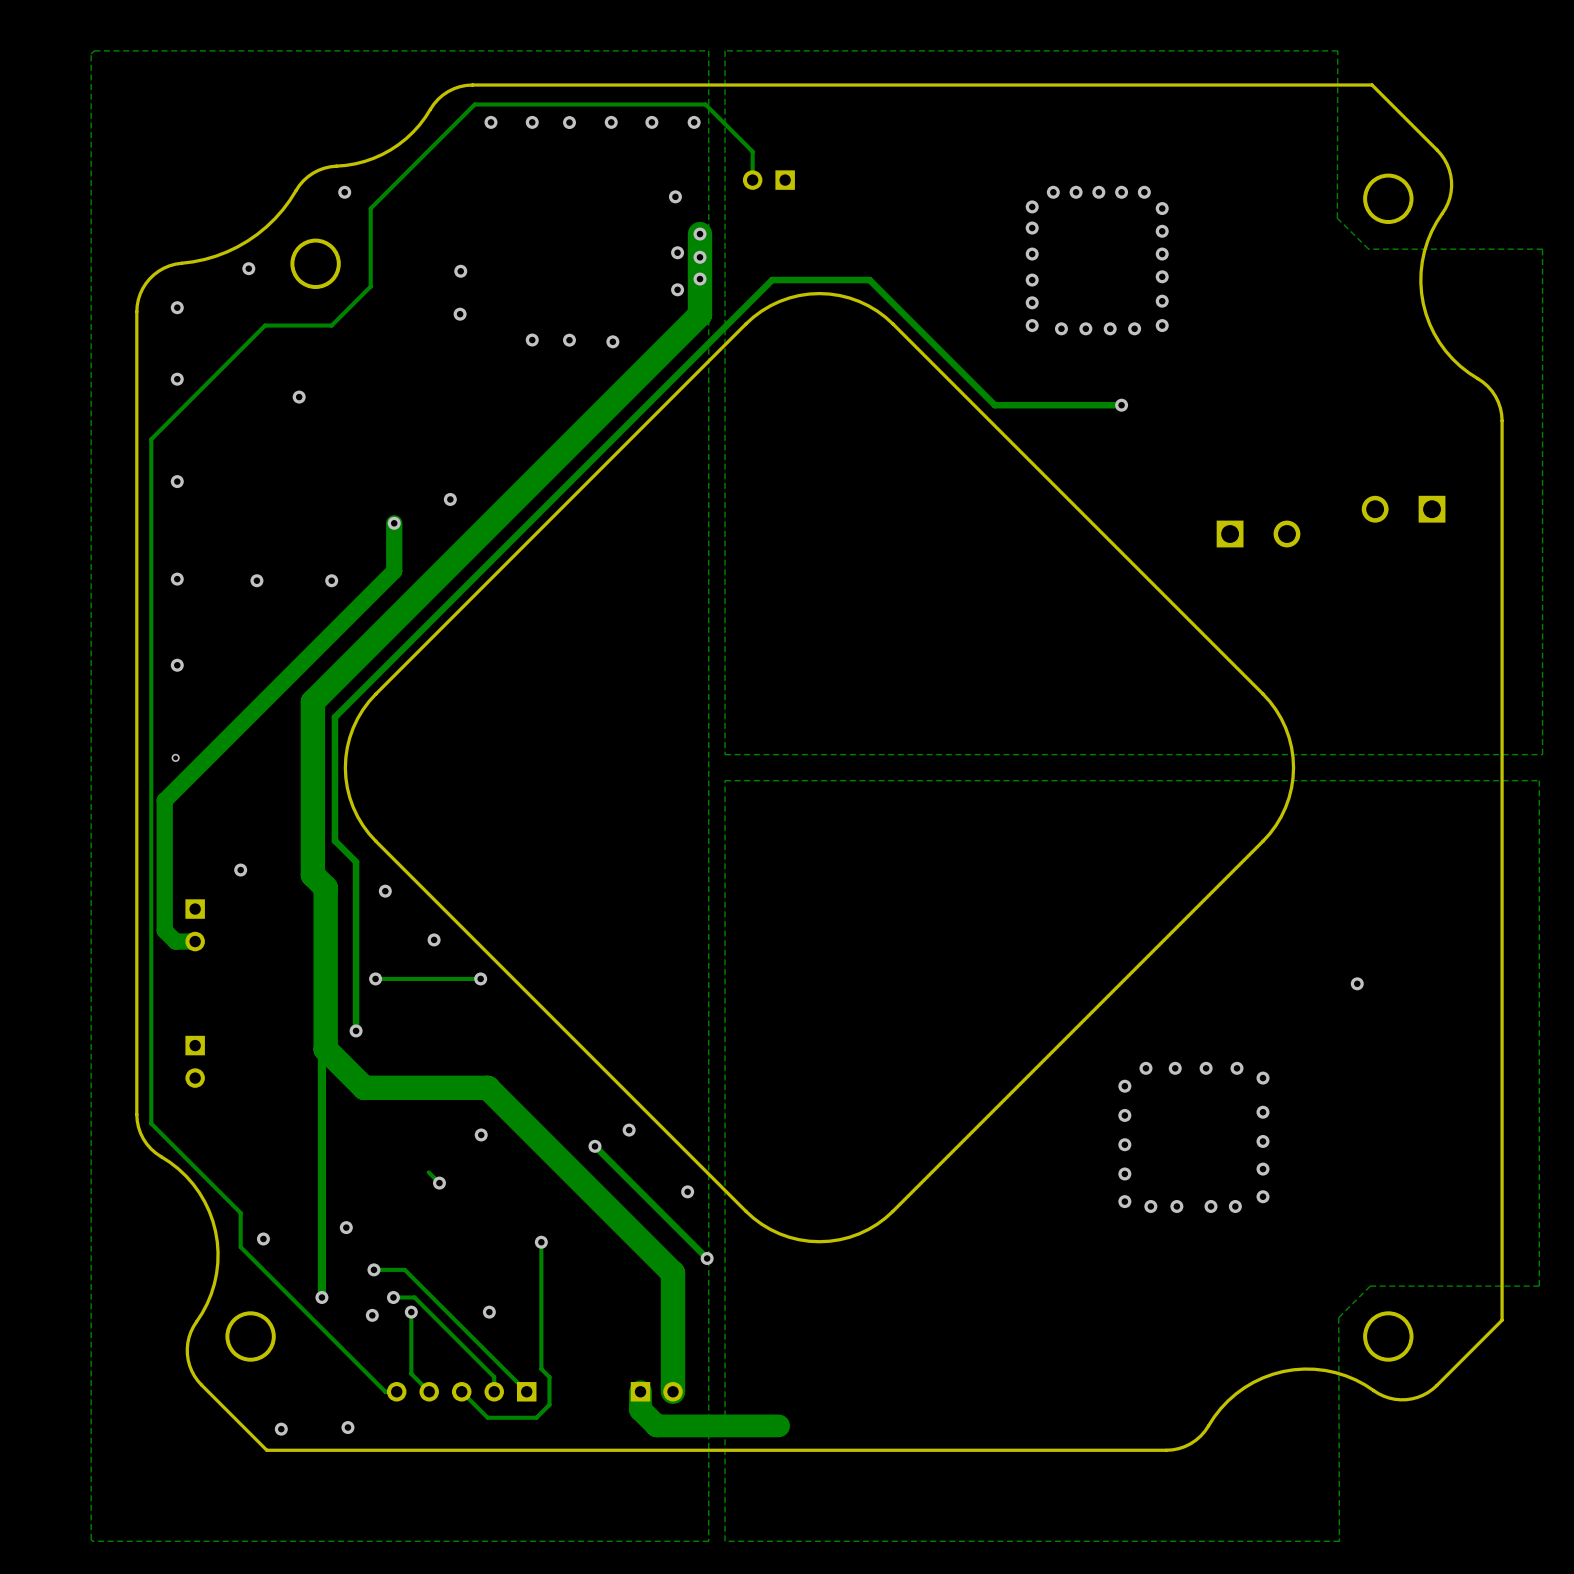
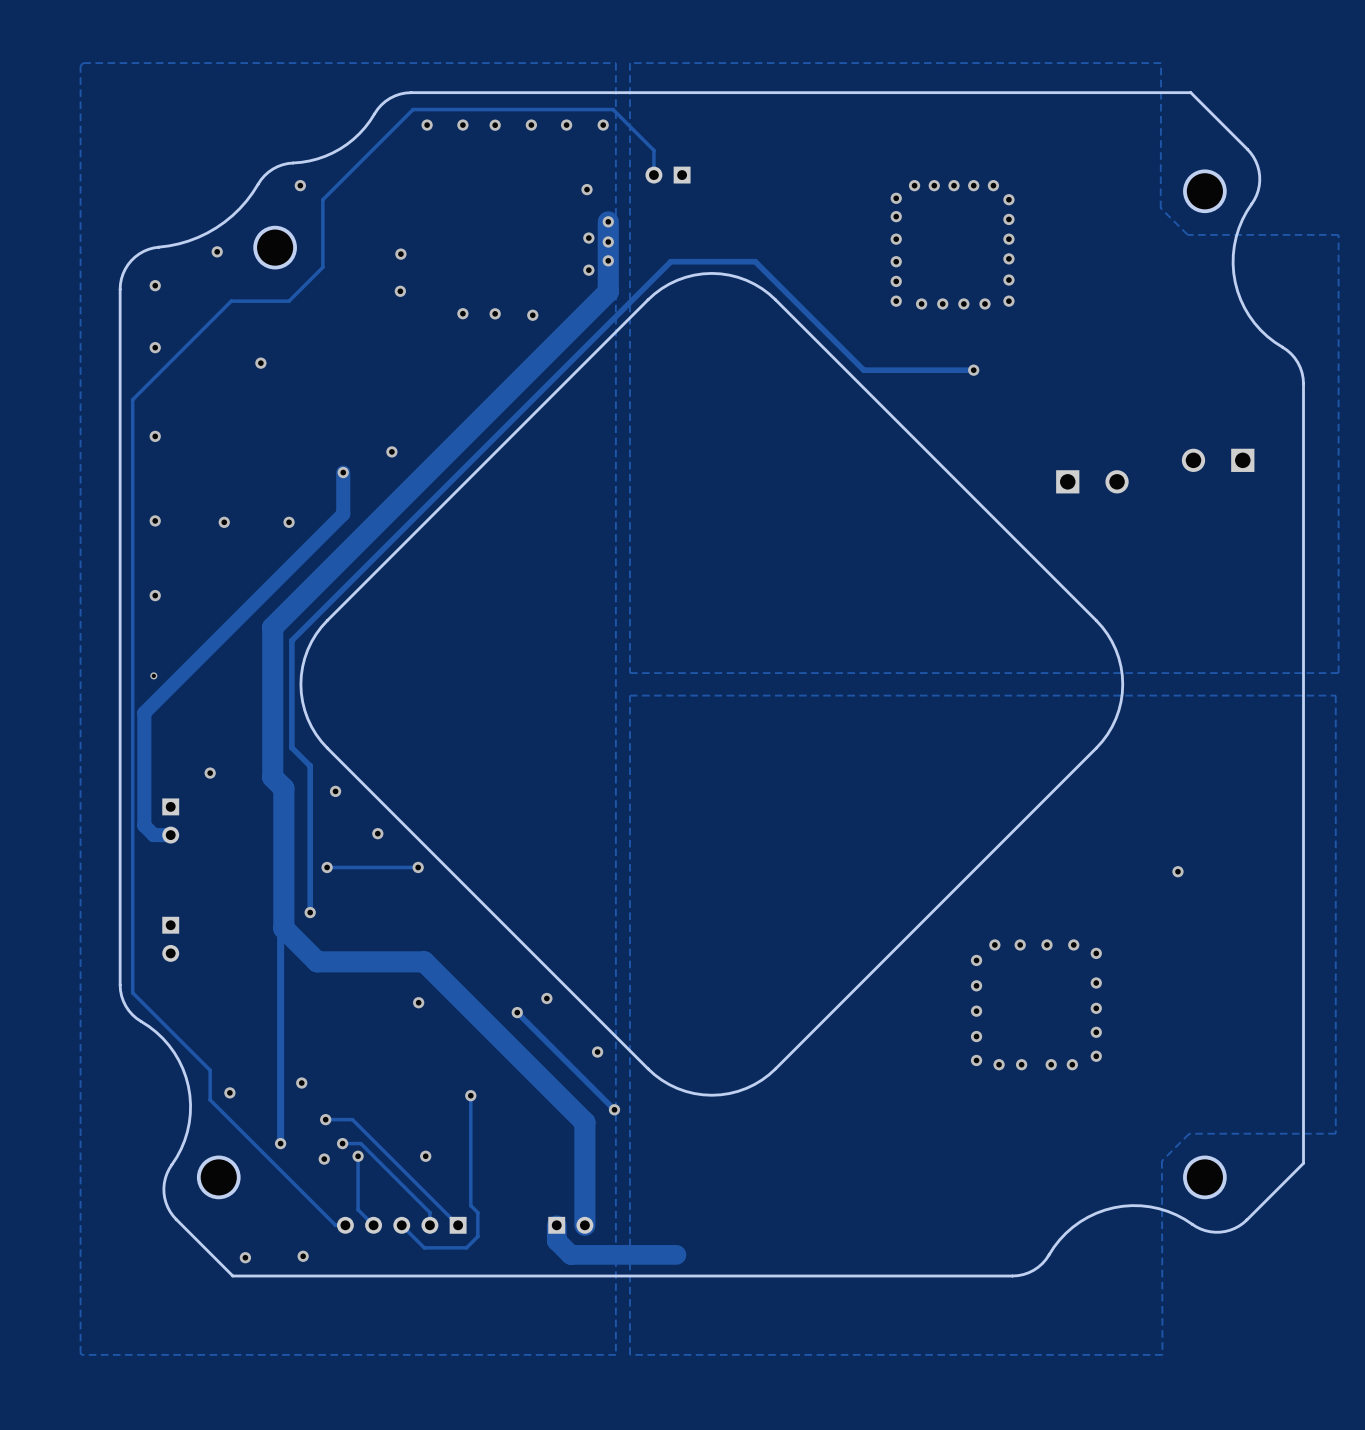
track: (428, 1172) (439, 1183) -> none
via: (439, 1183) -> none

